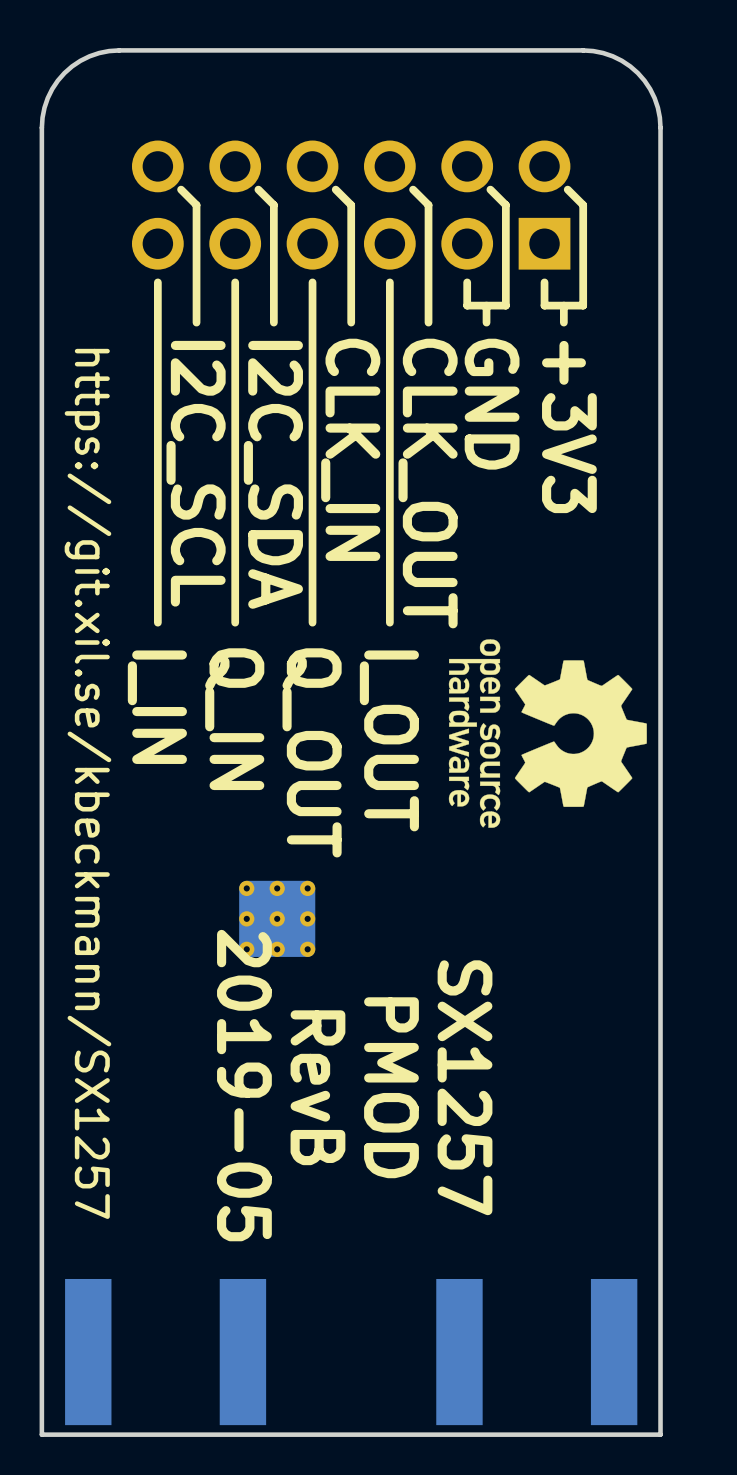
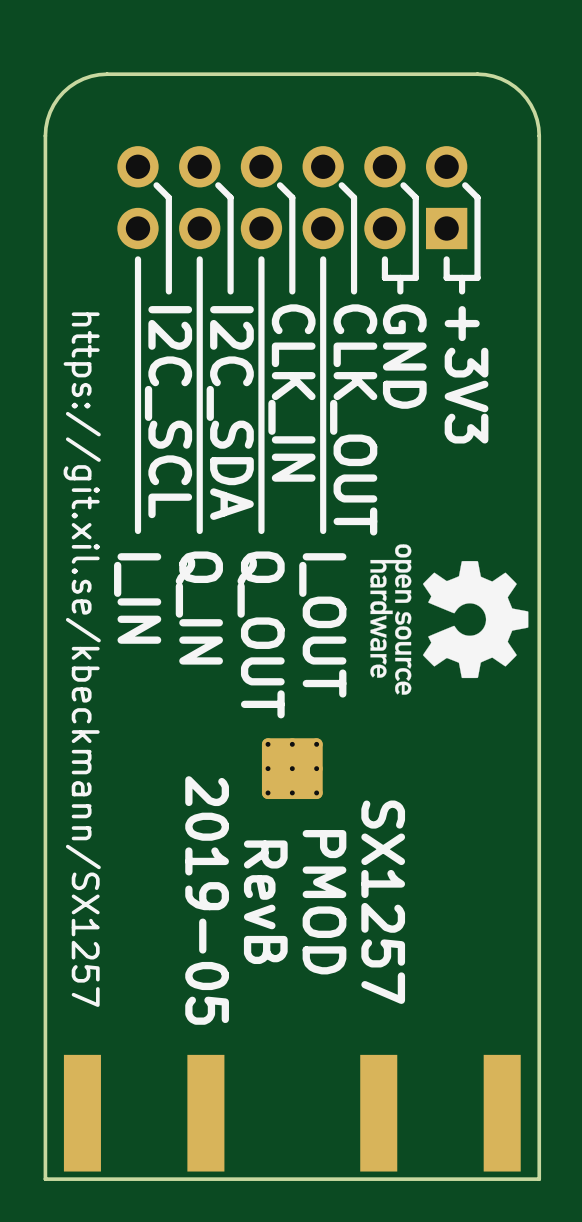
part position: (277, 918) -> (292, 768)

